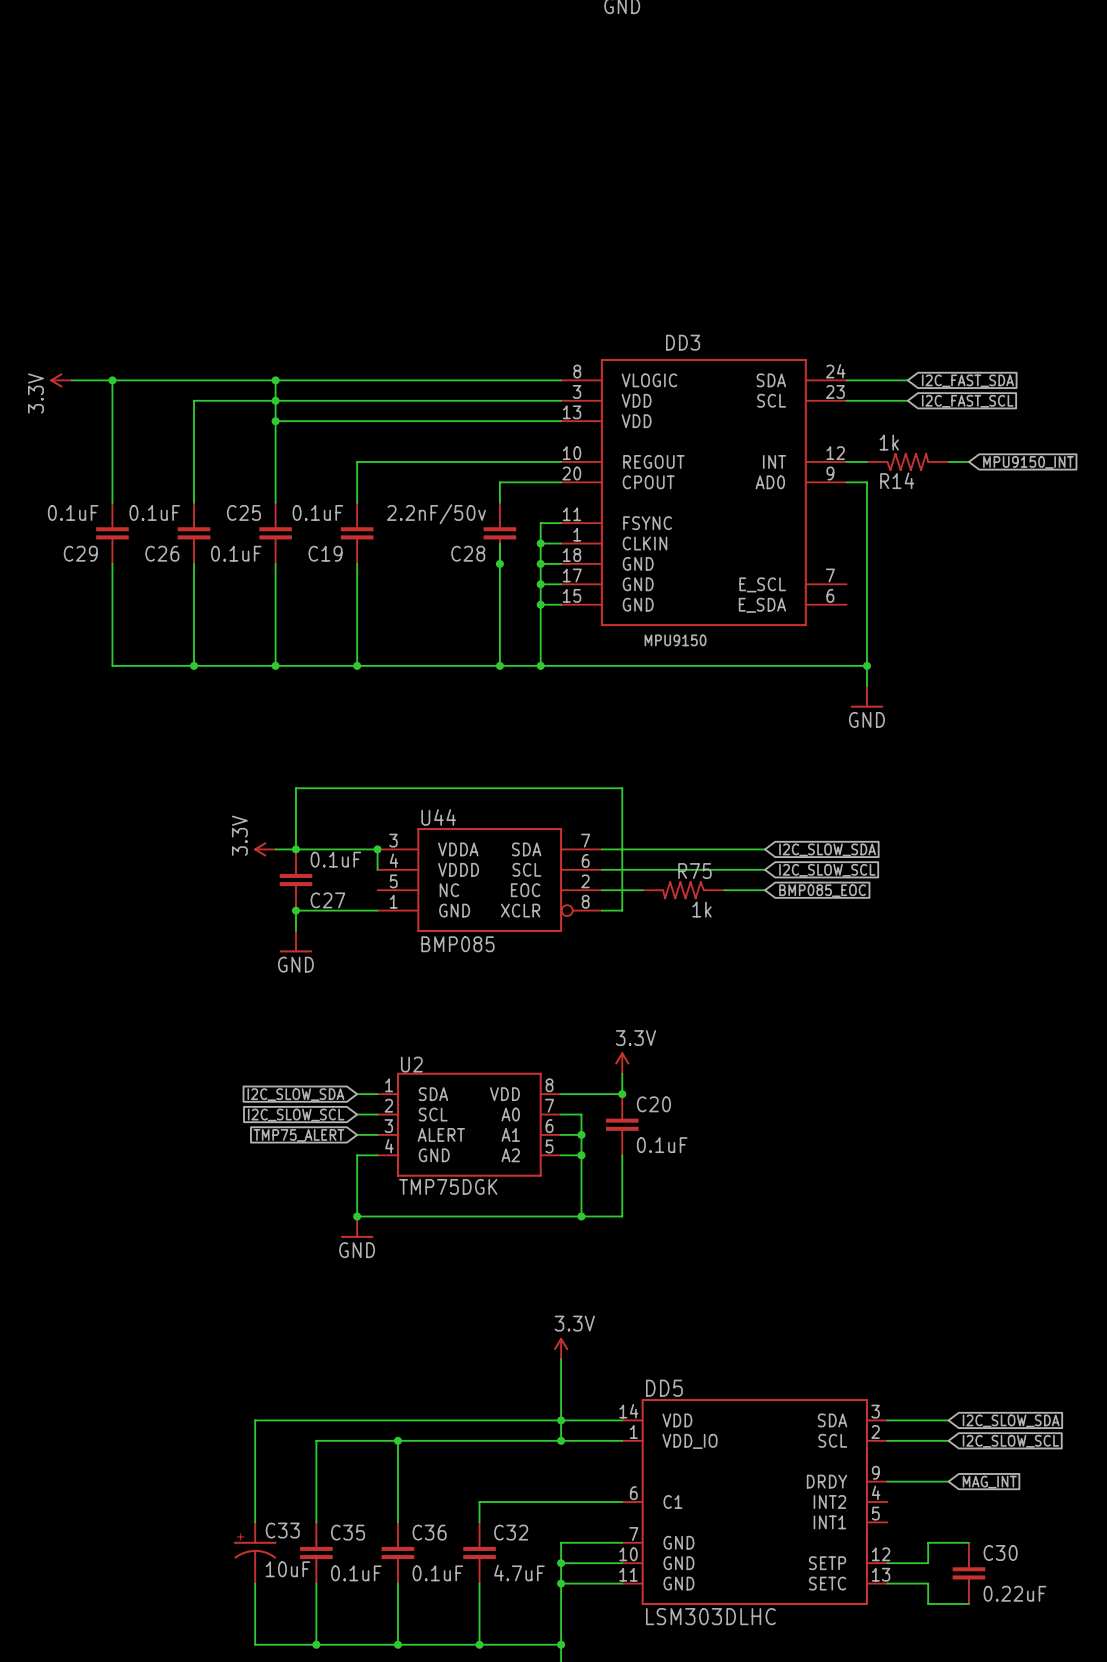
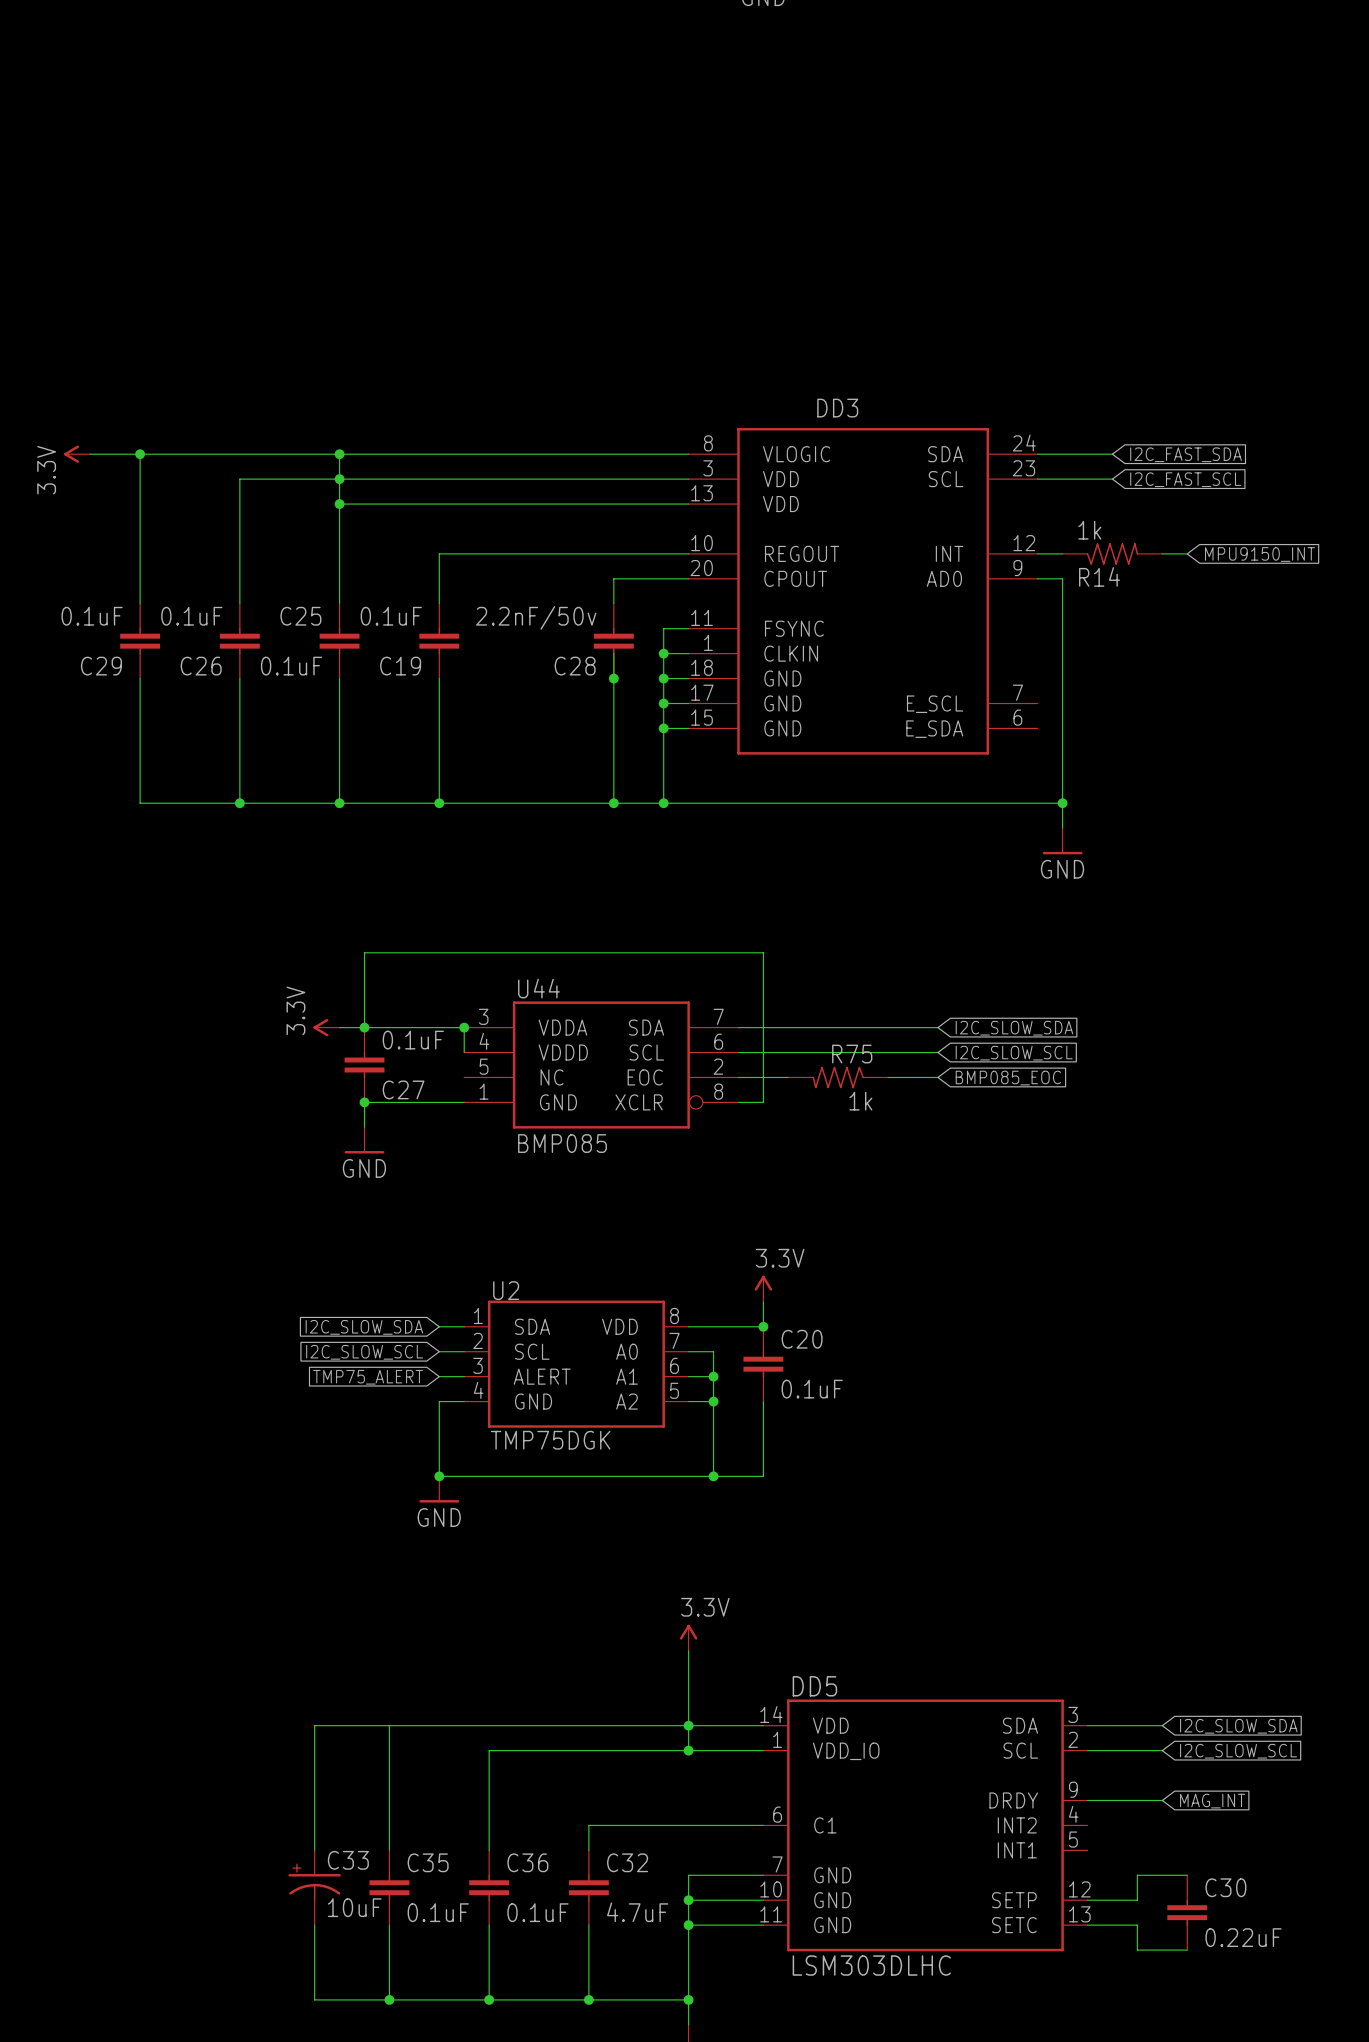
DD3 value: MPU9150 (675, 640) -> none
wire: (316, 1440) (397, 1440) -> (389, 1750) (389, 1725)
junction: (397, 1440) -> none

